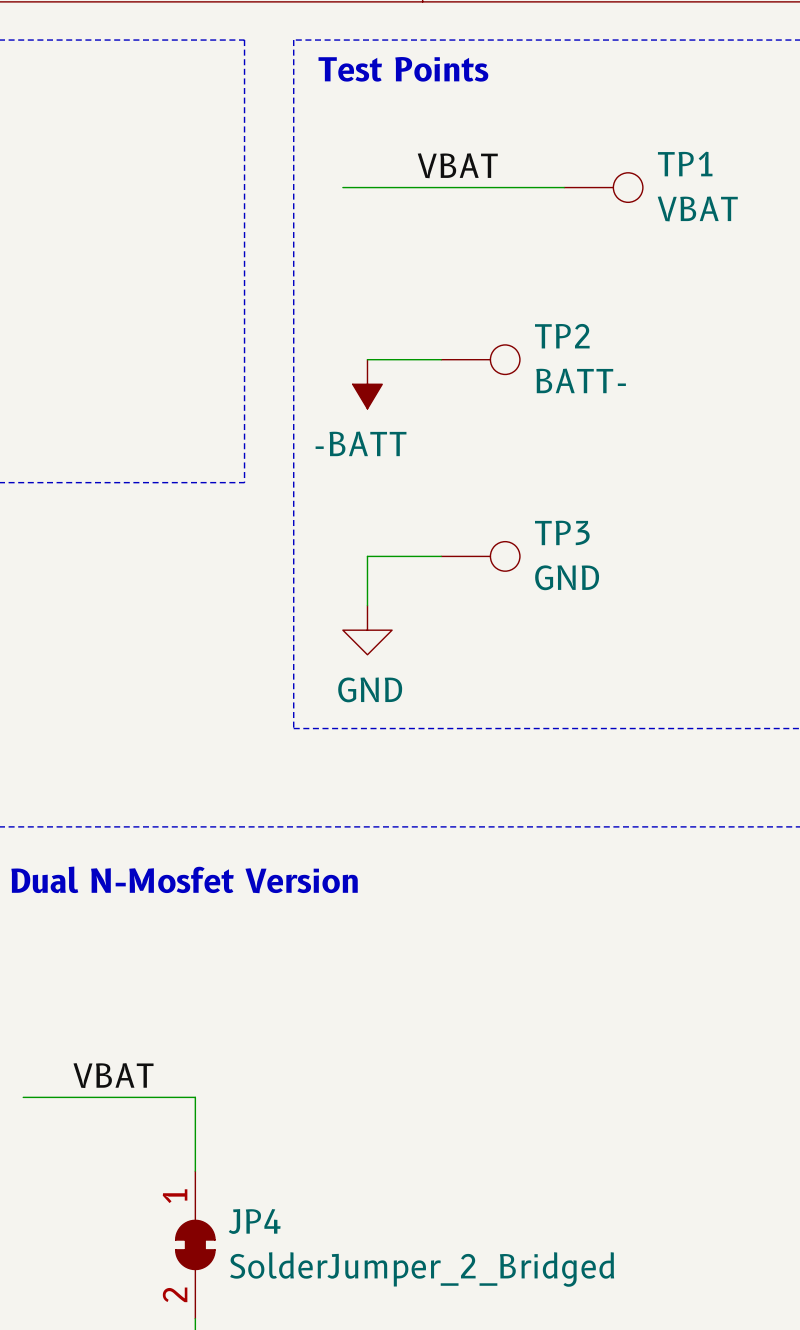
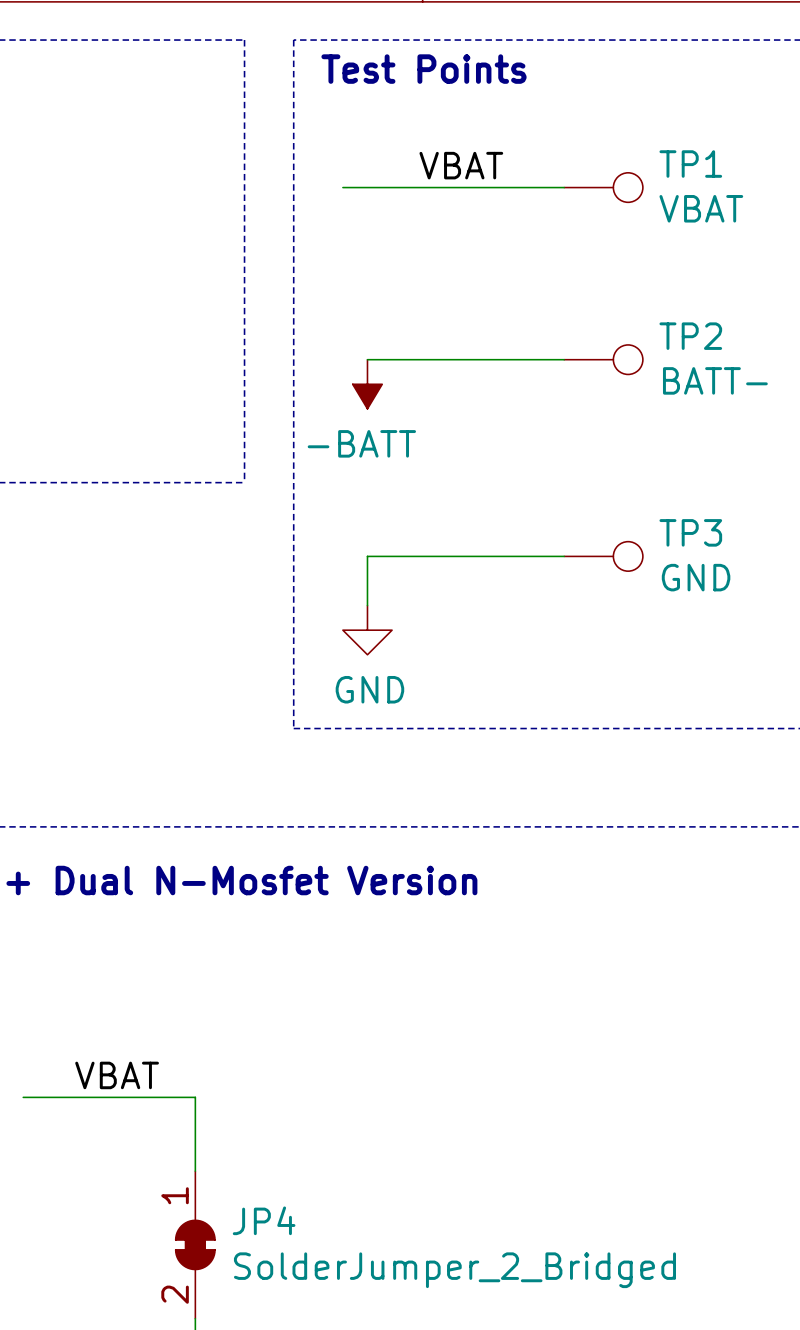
wire: none -> (441, 359) (564, 359)
TP2 position: (480, 359) -> (603, 359)
wire: none -> (441, 556) (564, 556)
TP3 position: (480, 556) -> (603, 556)

